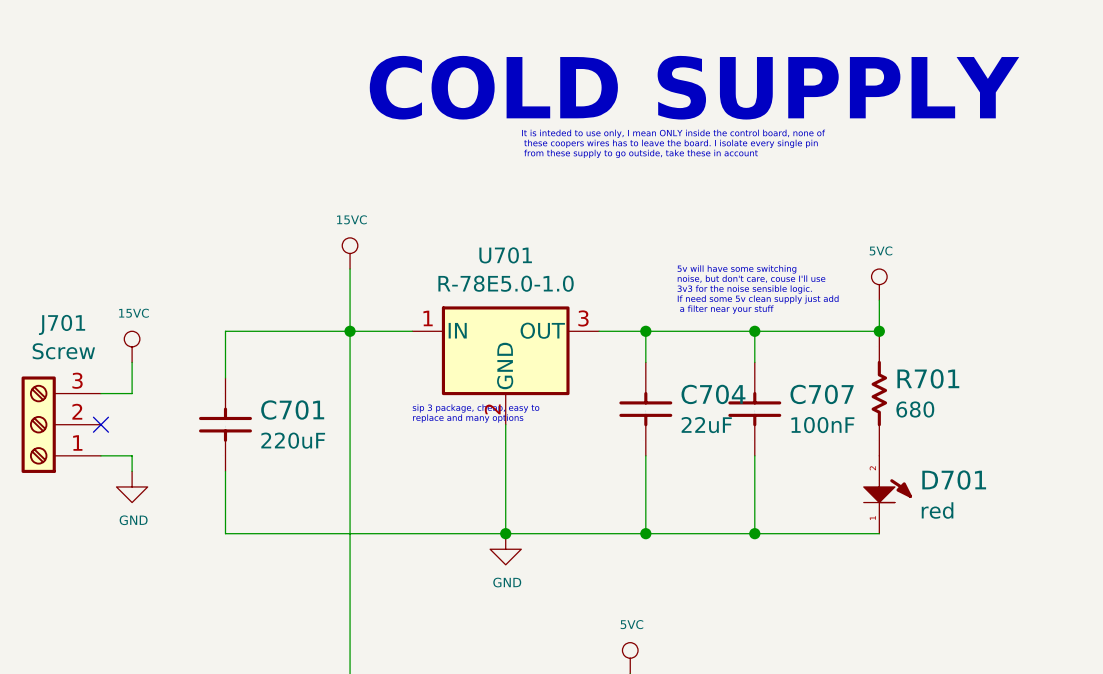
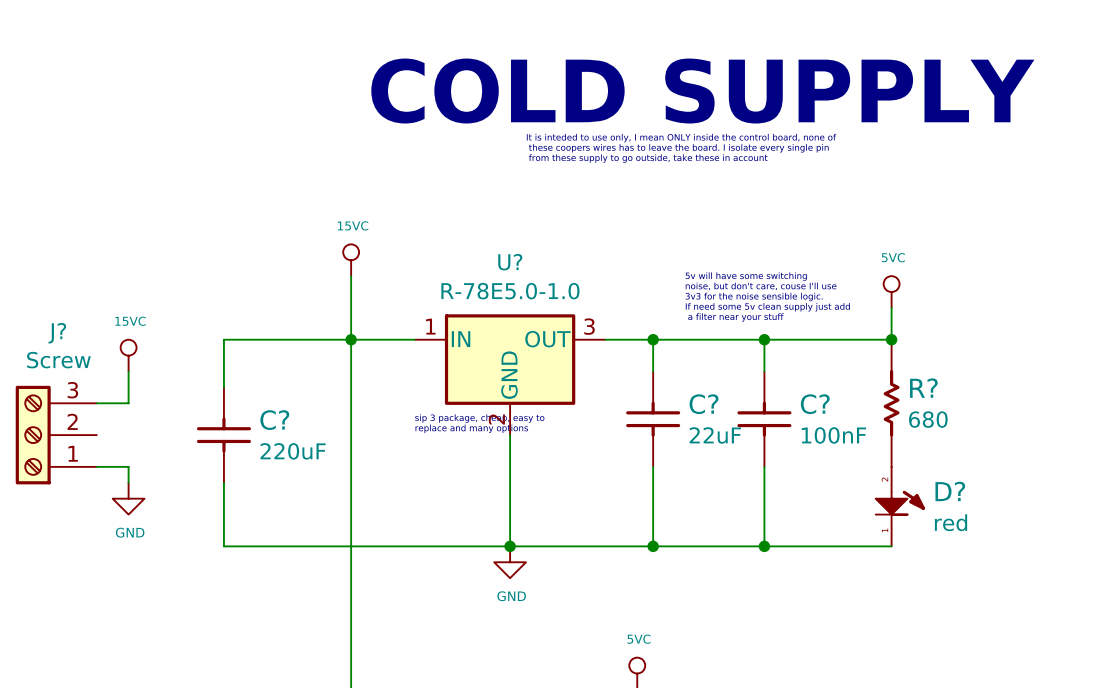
U701 name: U701 (505, 255) -> U? (510, 262)
J701 name: J701 (62, 324) -> J? (57, 333)
R701 name: R701 (928, 378) -> R? (923, 388)
C704 name: C704 (713, 394) -> C? (704, 404)
C707 name: C707 (822, 394) -> C? (815, 404)
C701 name: C701 (292, 410) -> C? (274, 420)
no-connect mark: (100, 424) -> none
D701 name: D701 (954, 480) -> D? (950, 491)

